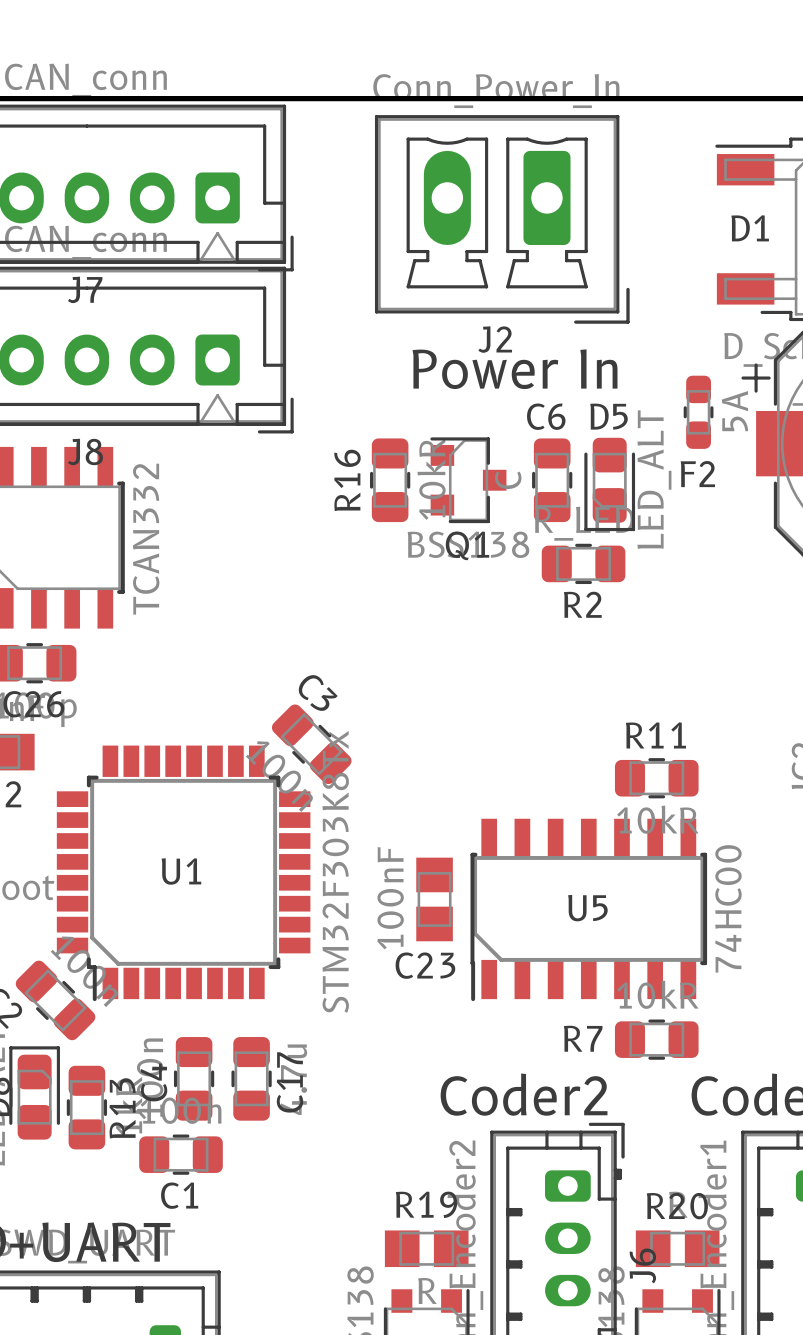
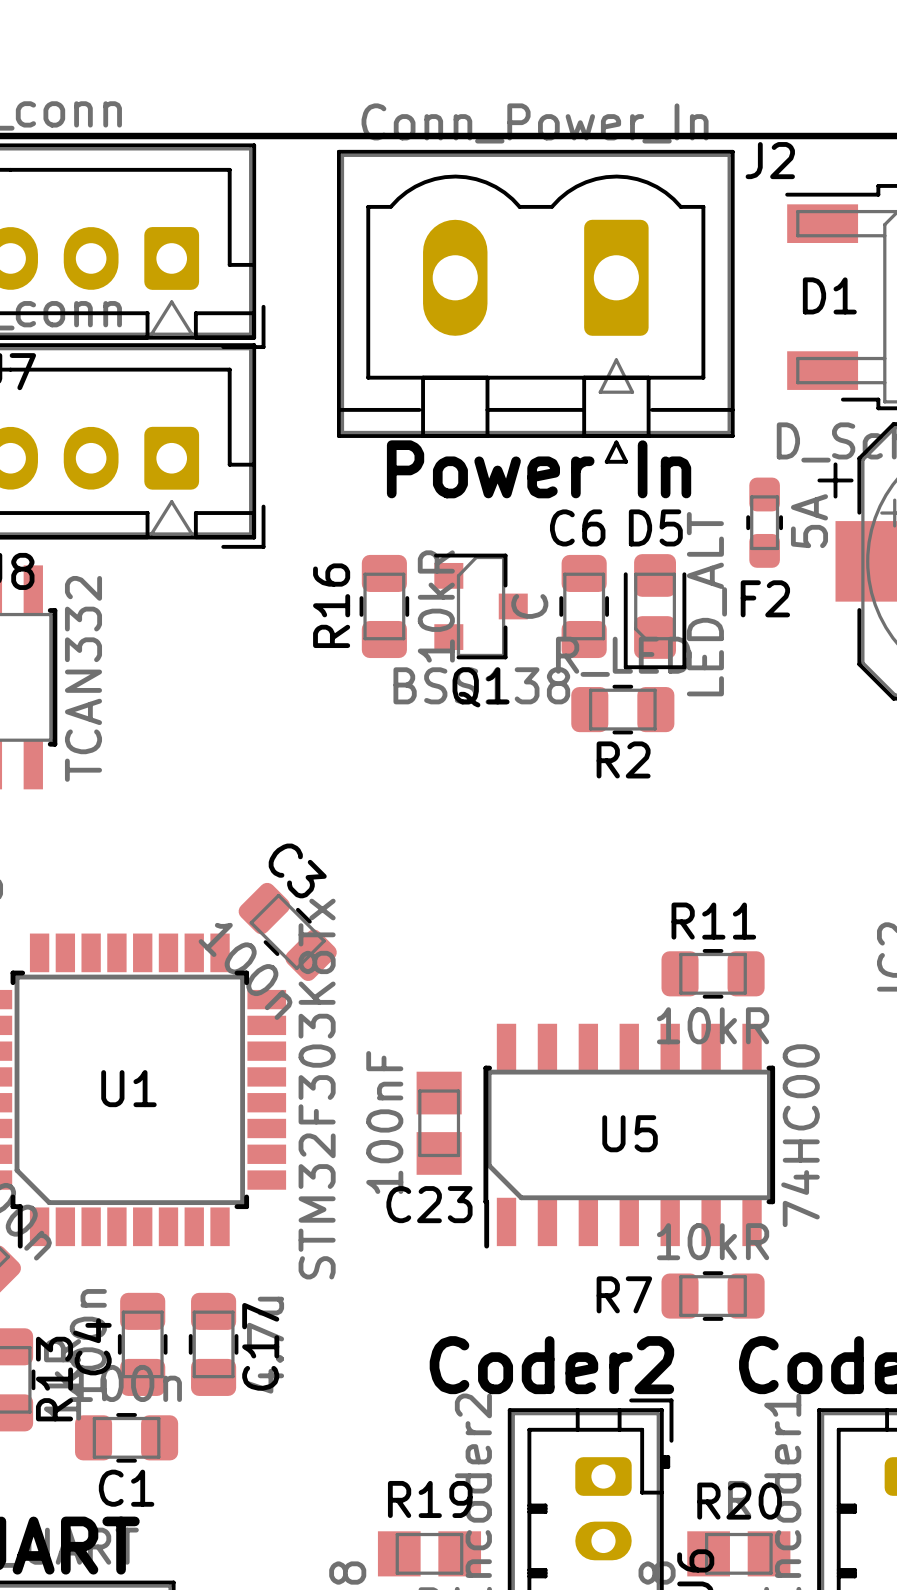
J2 footprint: [374, 115, 630, 324] -> [337, 149, 735, 464]
J2 name position: J2 (495, 339) -> J2 (770, 160)

